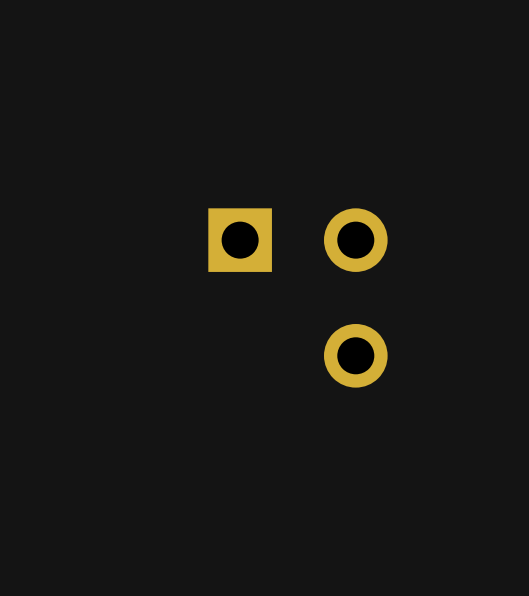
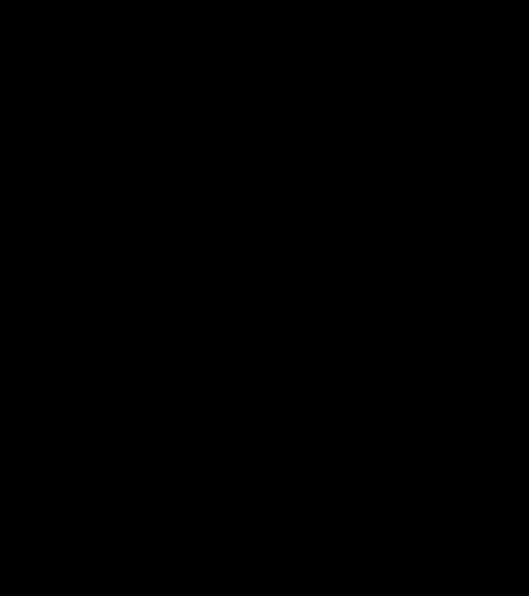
part: (297, 297) -> none

